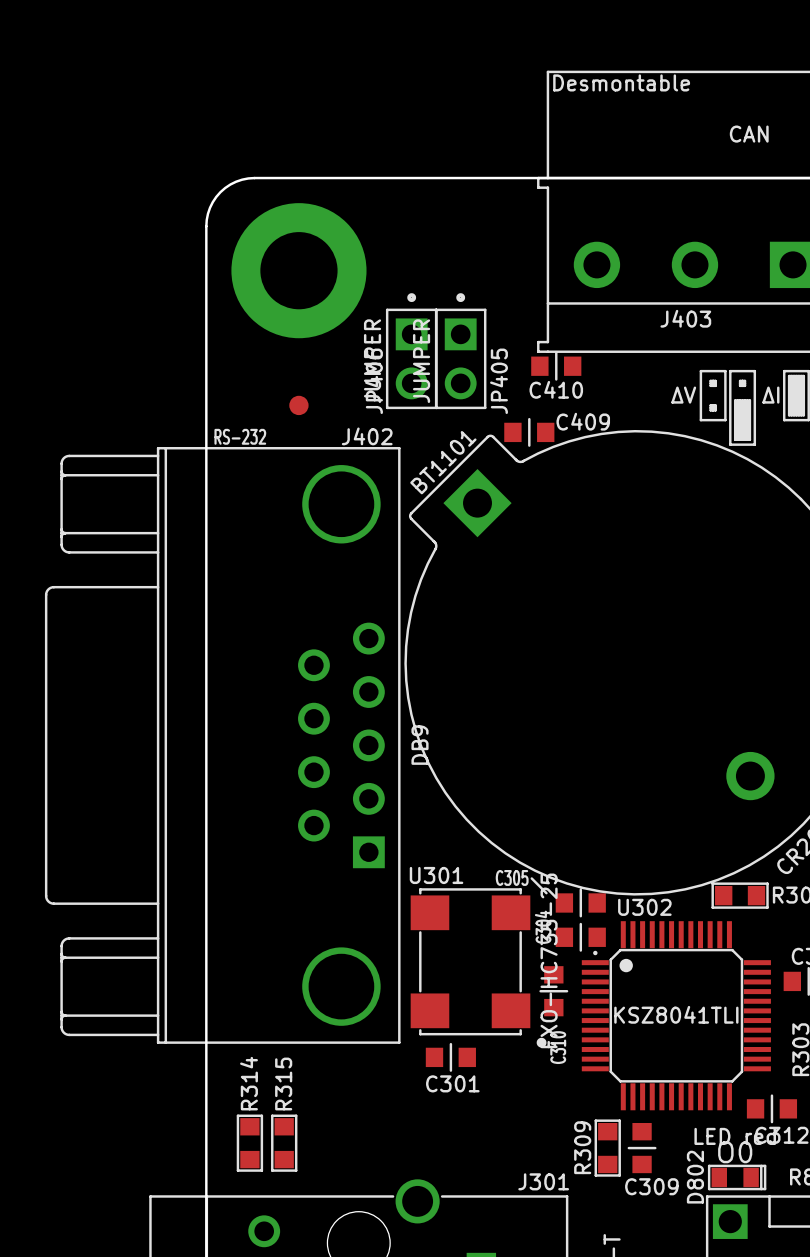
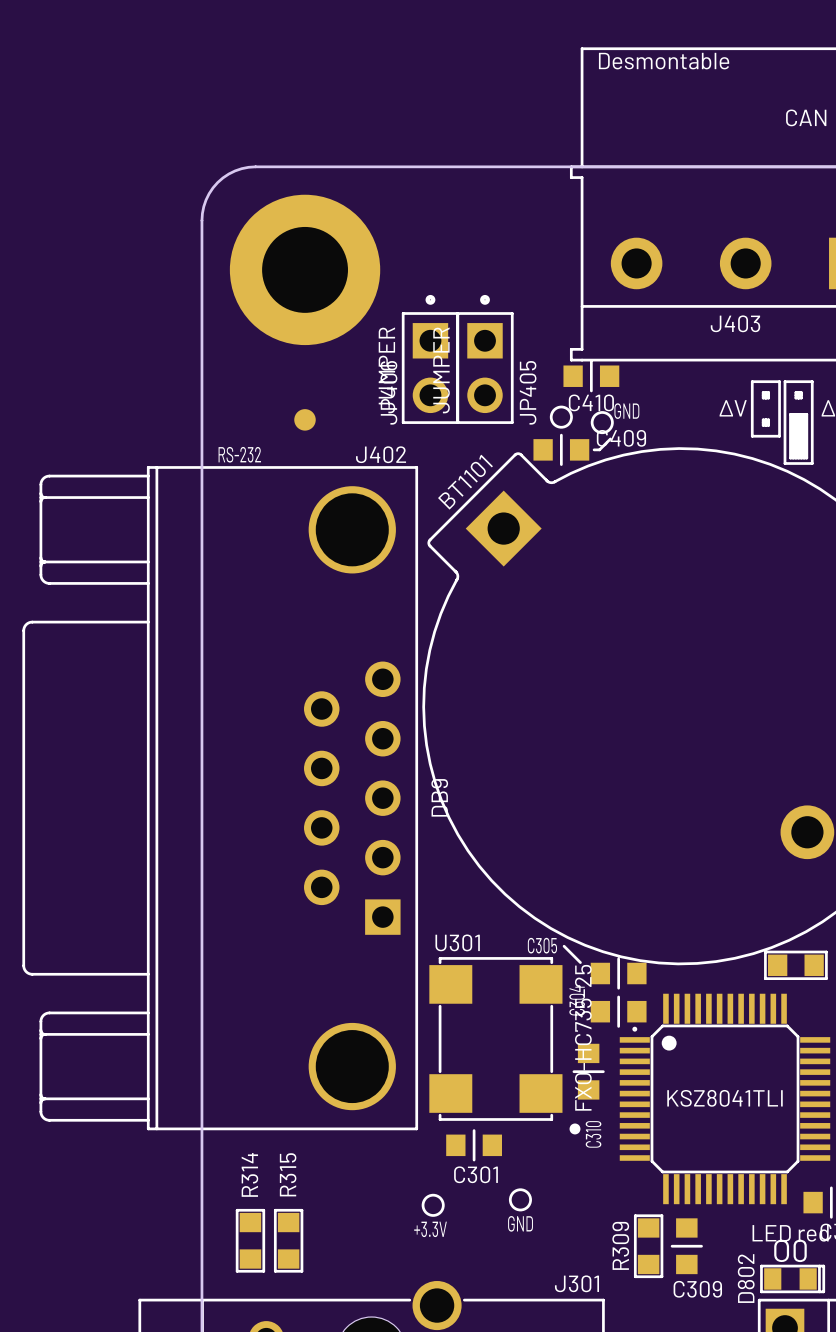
drawing: none -> [549, 405, 614, 435]
text: none -> GND (626, 411)
line: none -> (610, 438) (599, 449) (594, 449)
U302 name: U302 (644, 907) -> none
drawing: none -> [508, 1188, 532, 1212]
drawing: none -> [421, 1193, 445, 1217]
text: none -> GND (520, 1223)
text: none -> +3.3V (430, 1229)

